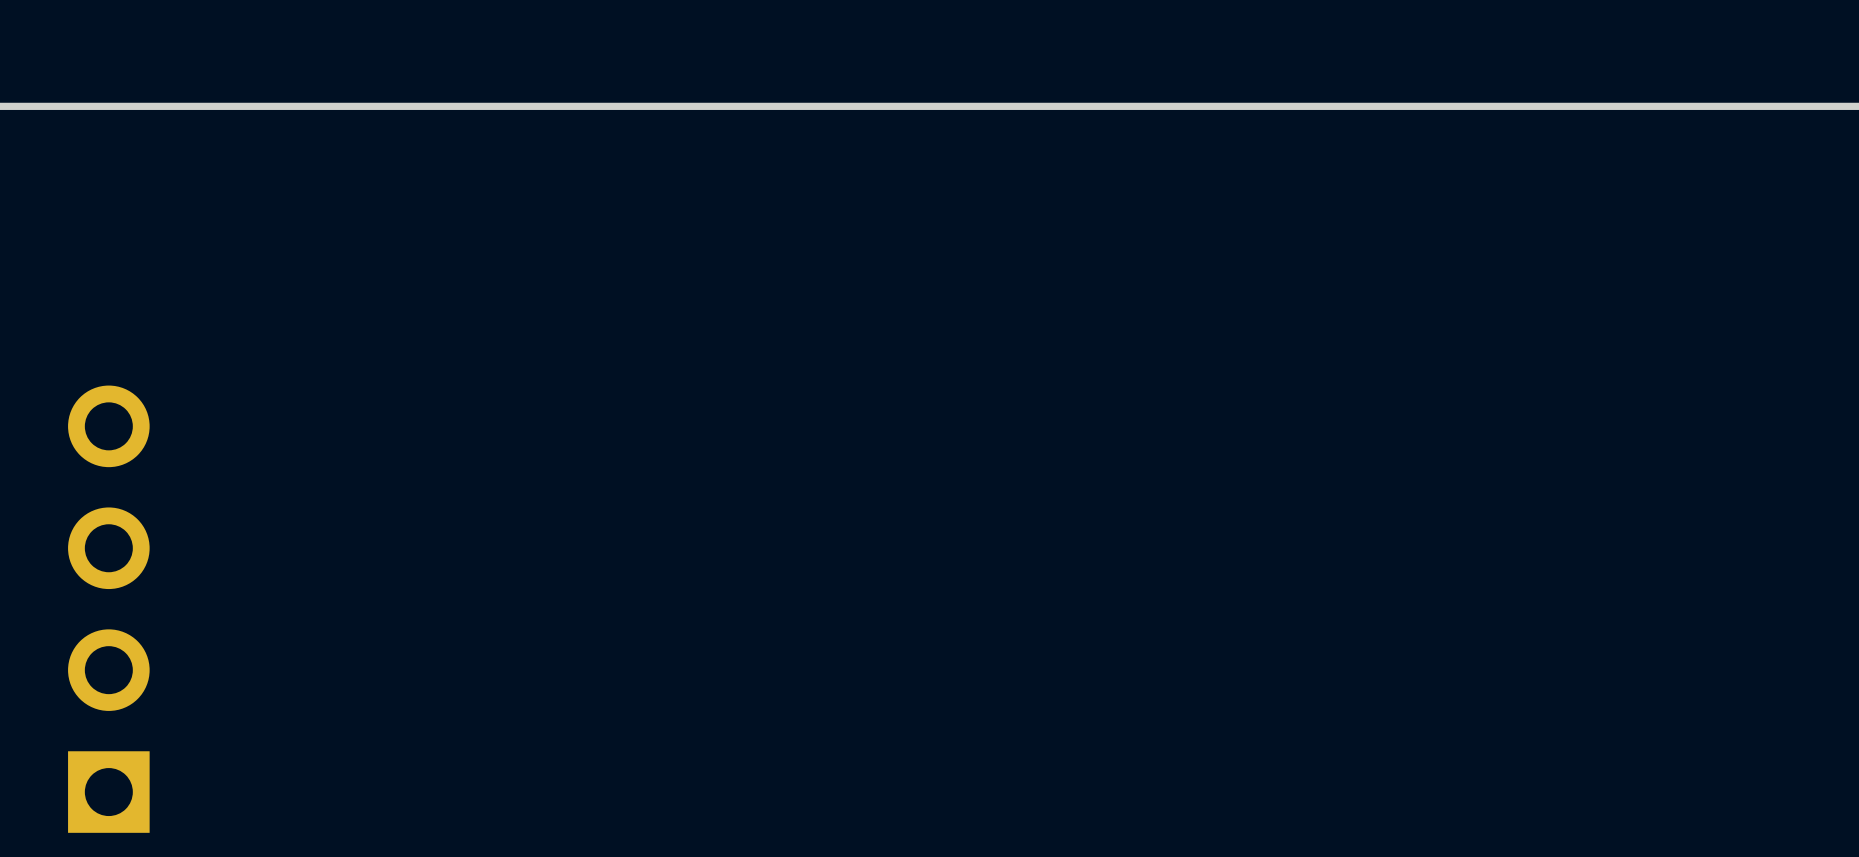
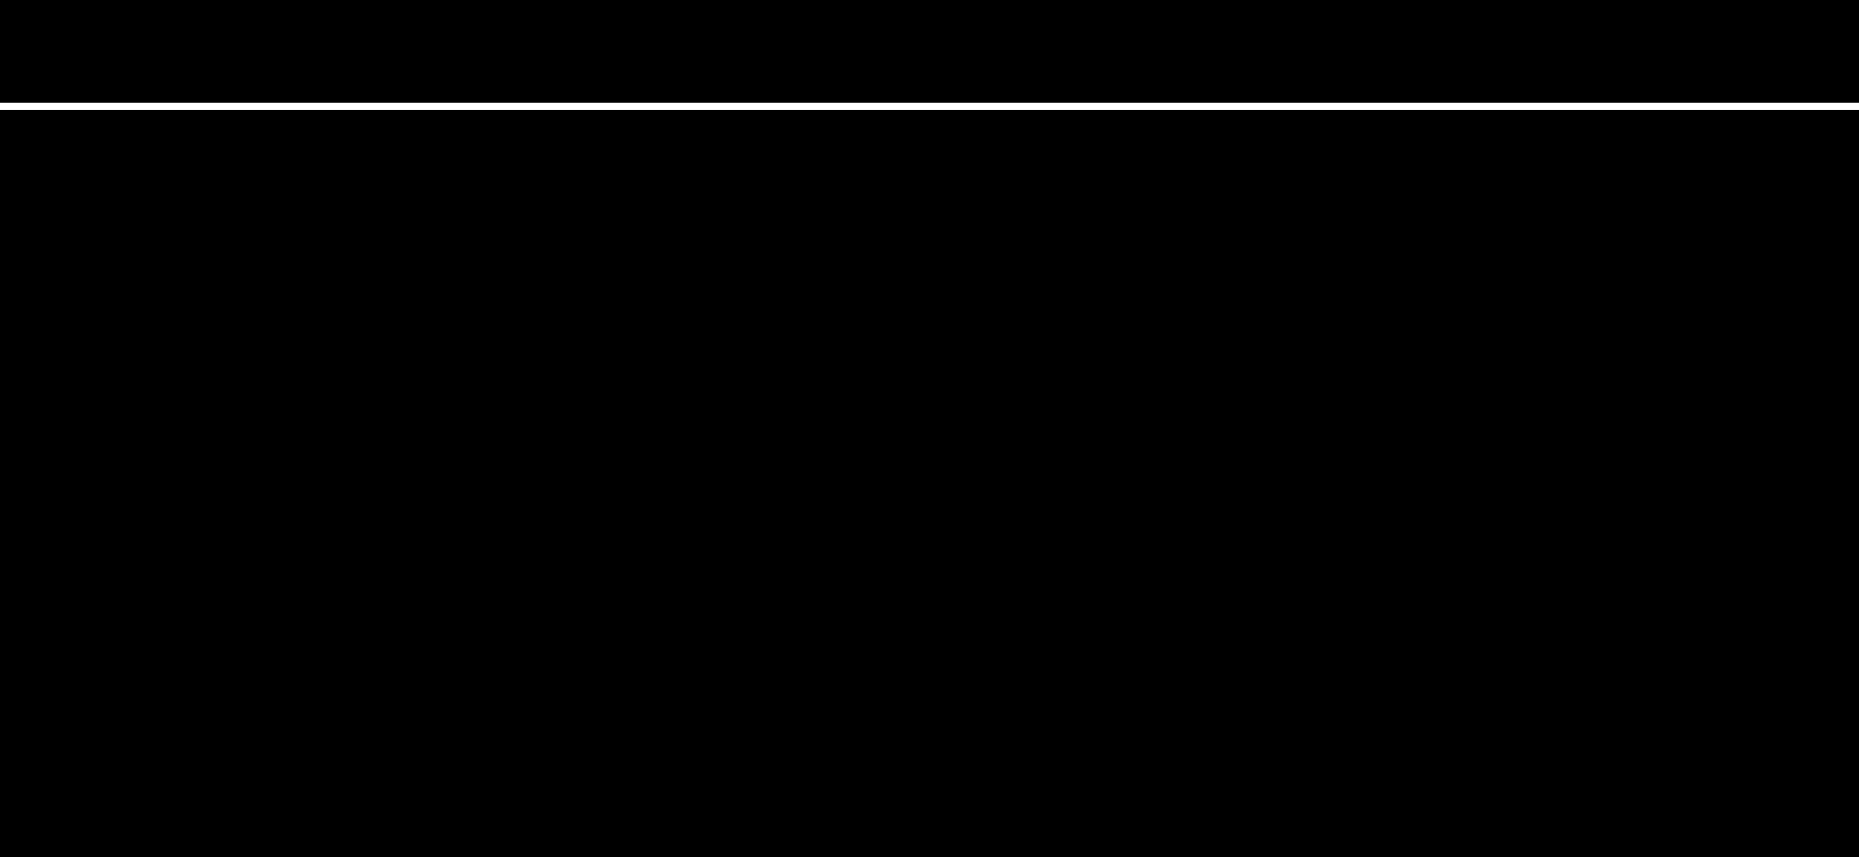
part: (108, 609) -> none

